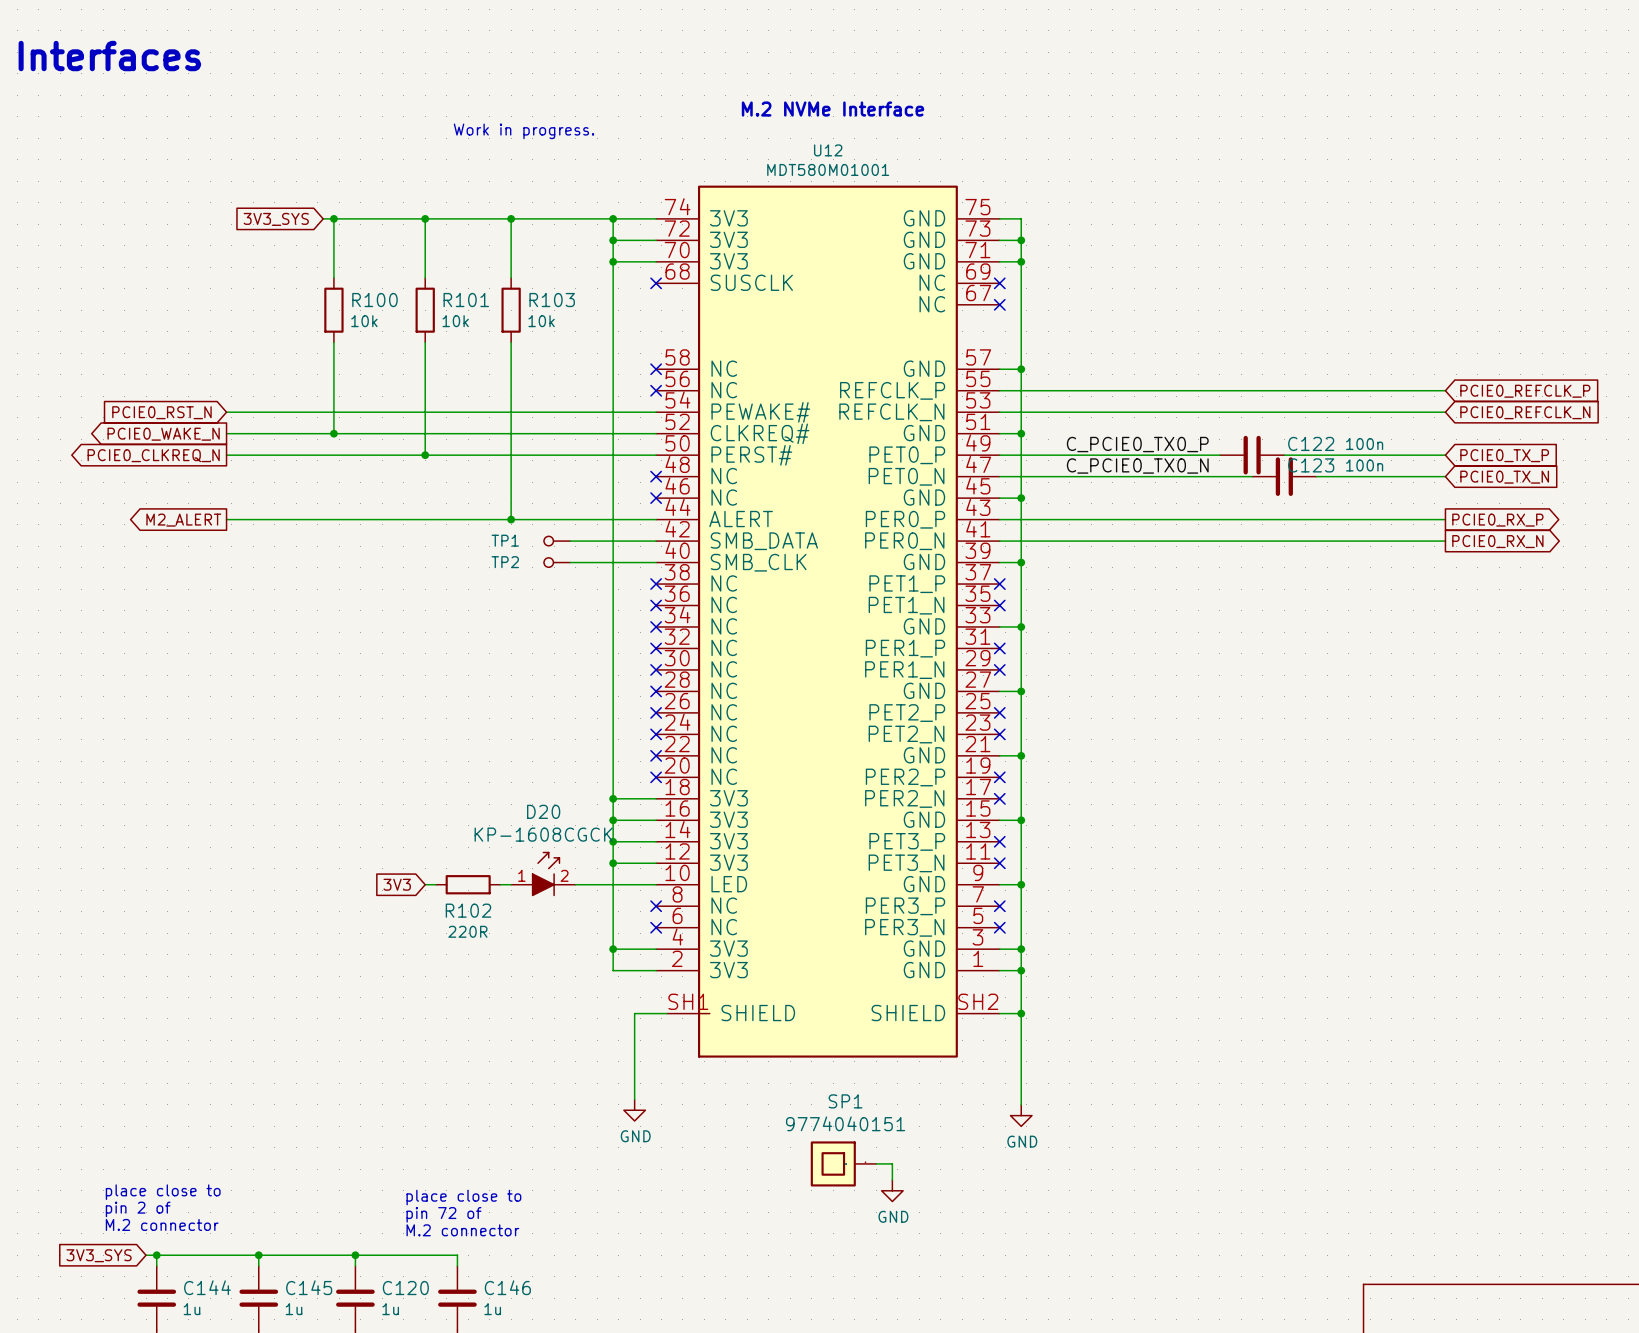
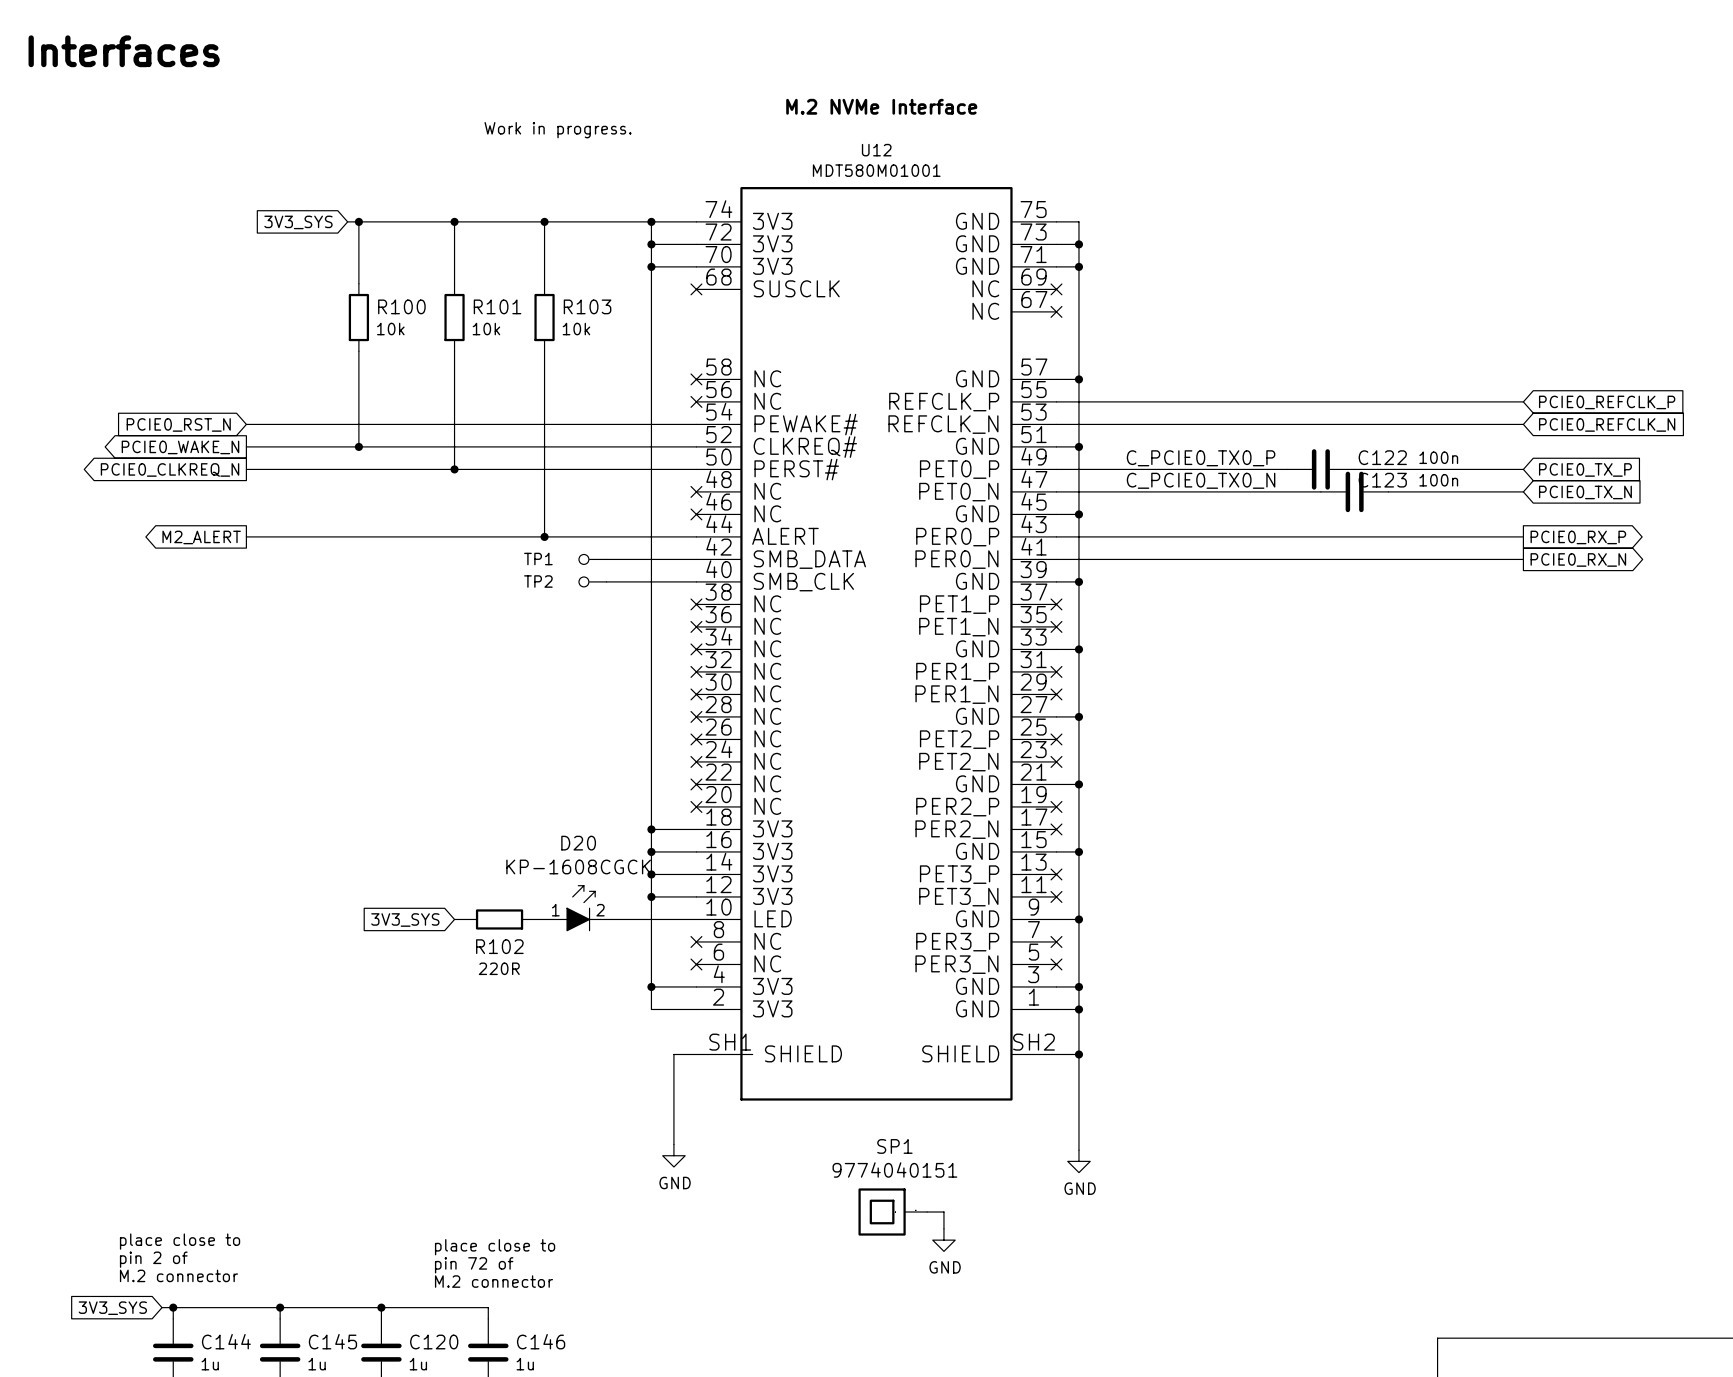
global label: 3V3 (397, 884) -> 3V3_SYS (405, 920)

